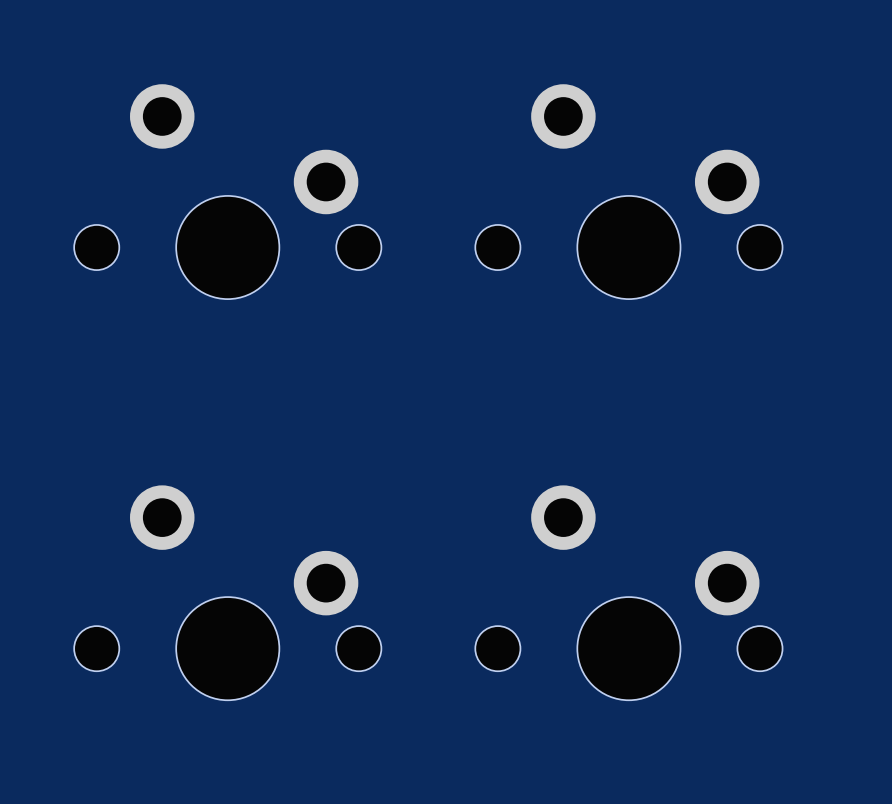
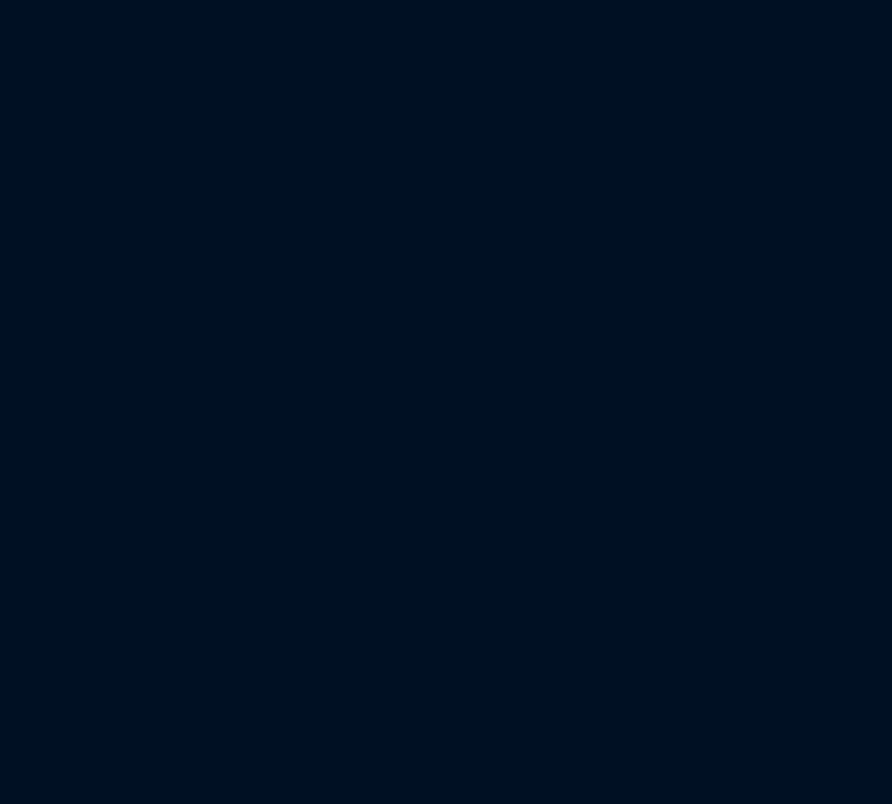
part: (227, 191) -> none
part: (628, 191) -> none
part: (227, 592) -> none
part: (628, 592) -> none

